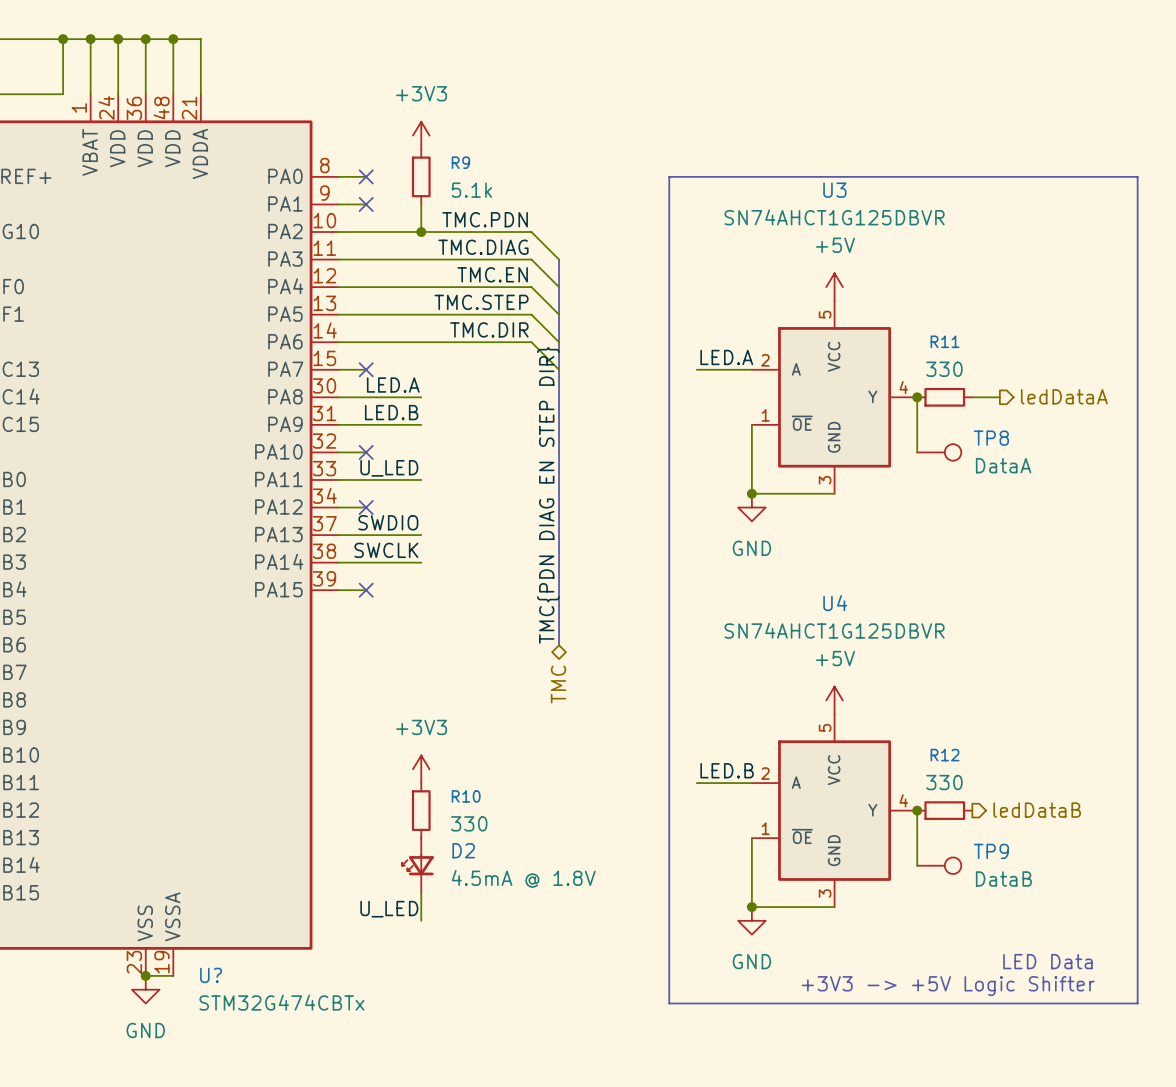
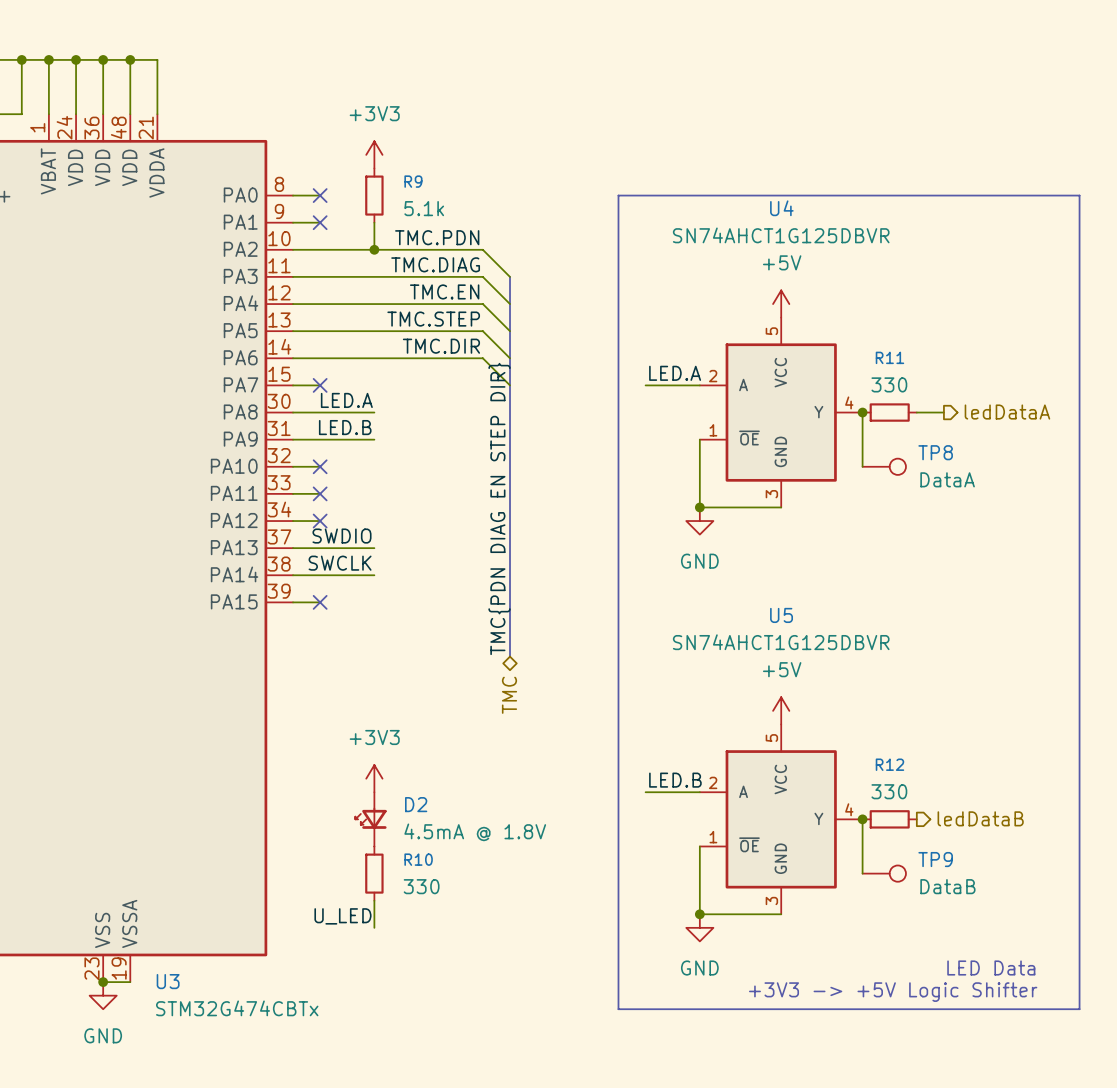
U3 name: U3 (834, 190) -> U4 (781, 208)
label: U_LED (389, 468) -> none
wire: (366, 479) (421, 479) -> none
no-connect mark: none -> (320, 493)
U4 name: U4 (835, 603) -> U5 (781, 615)
R10 position: (421, 810) -> (374, 873)
D2 position: (417, 865) -> (371, 819)
U? name: U? (211, 975) -> U3 (168, 981)

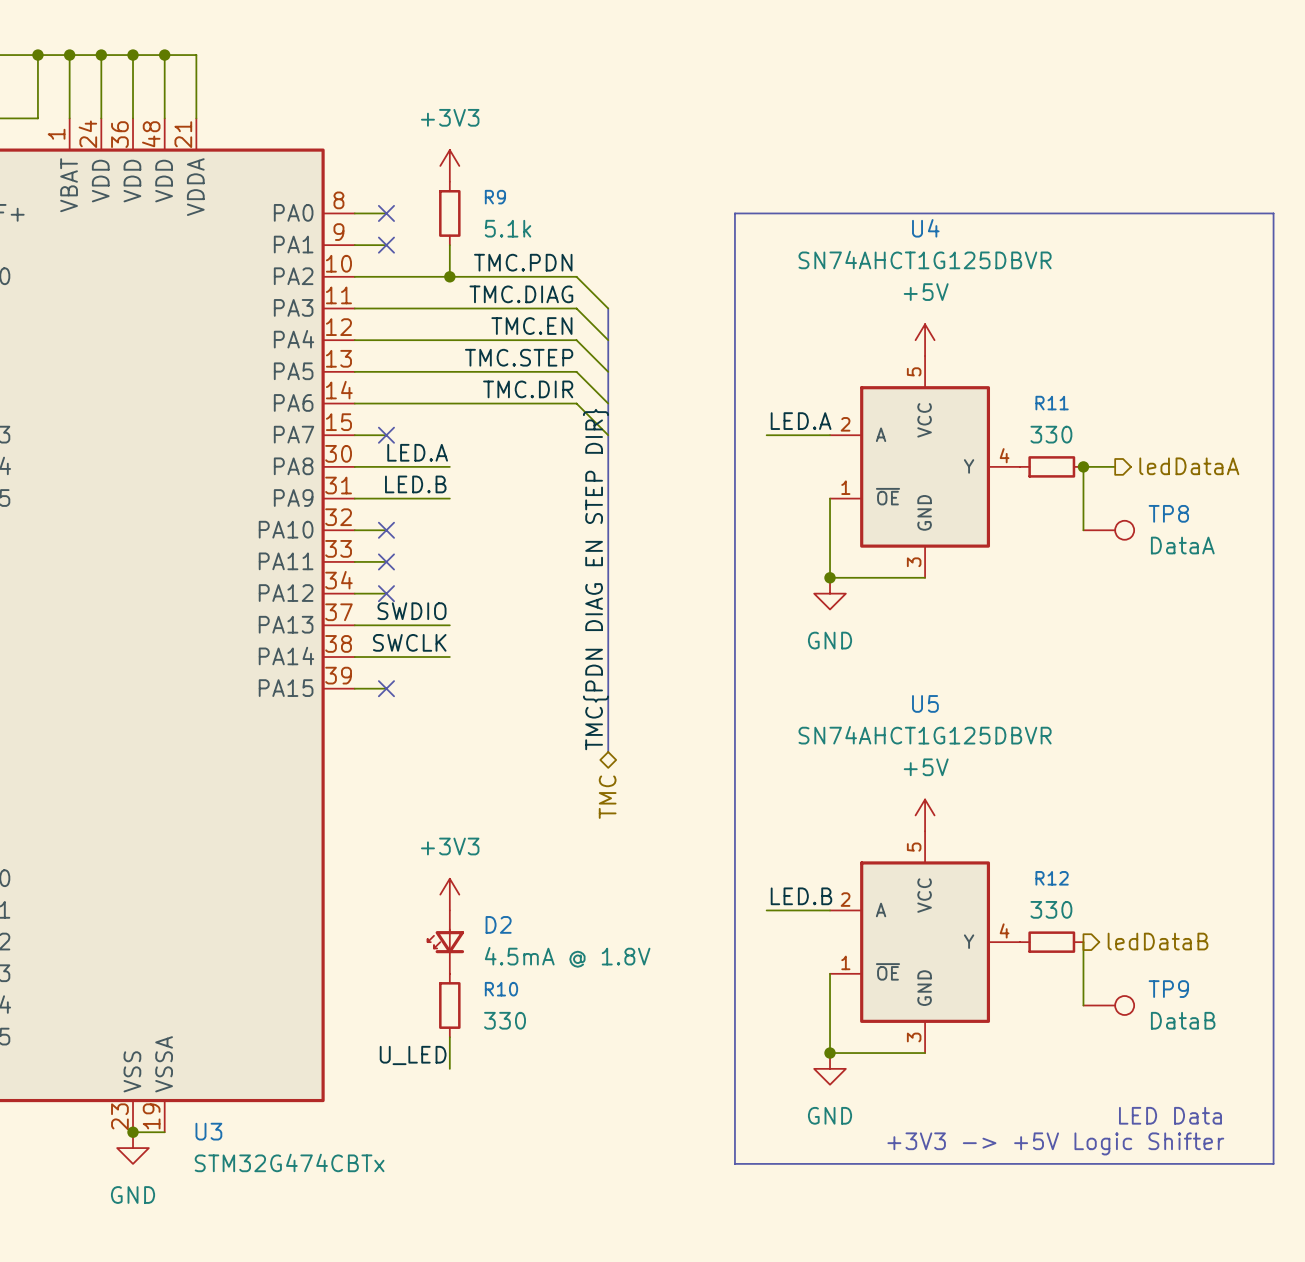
wire: (862, 412) (862, 466) -> (1083, 466) (1083, 530)
junction position: (862, 412) -> (1083, 466)
TP8 position: (884, 466) -> (1108, 530)
wire: (862, 819) (862, 873) -> (1083, 942) (1083, 1005)
junction: (862, 819) -> none
TP9 position: (884, 873) -> (1108, 1005)

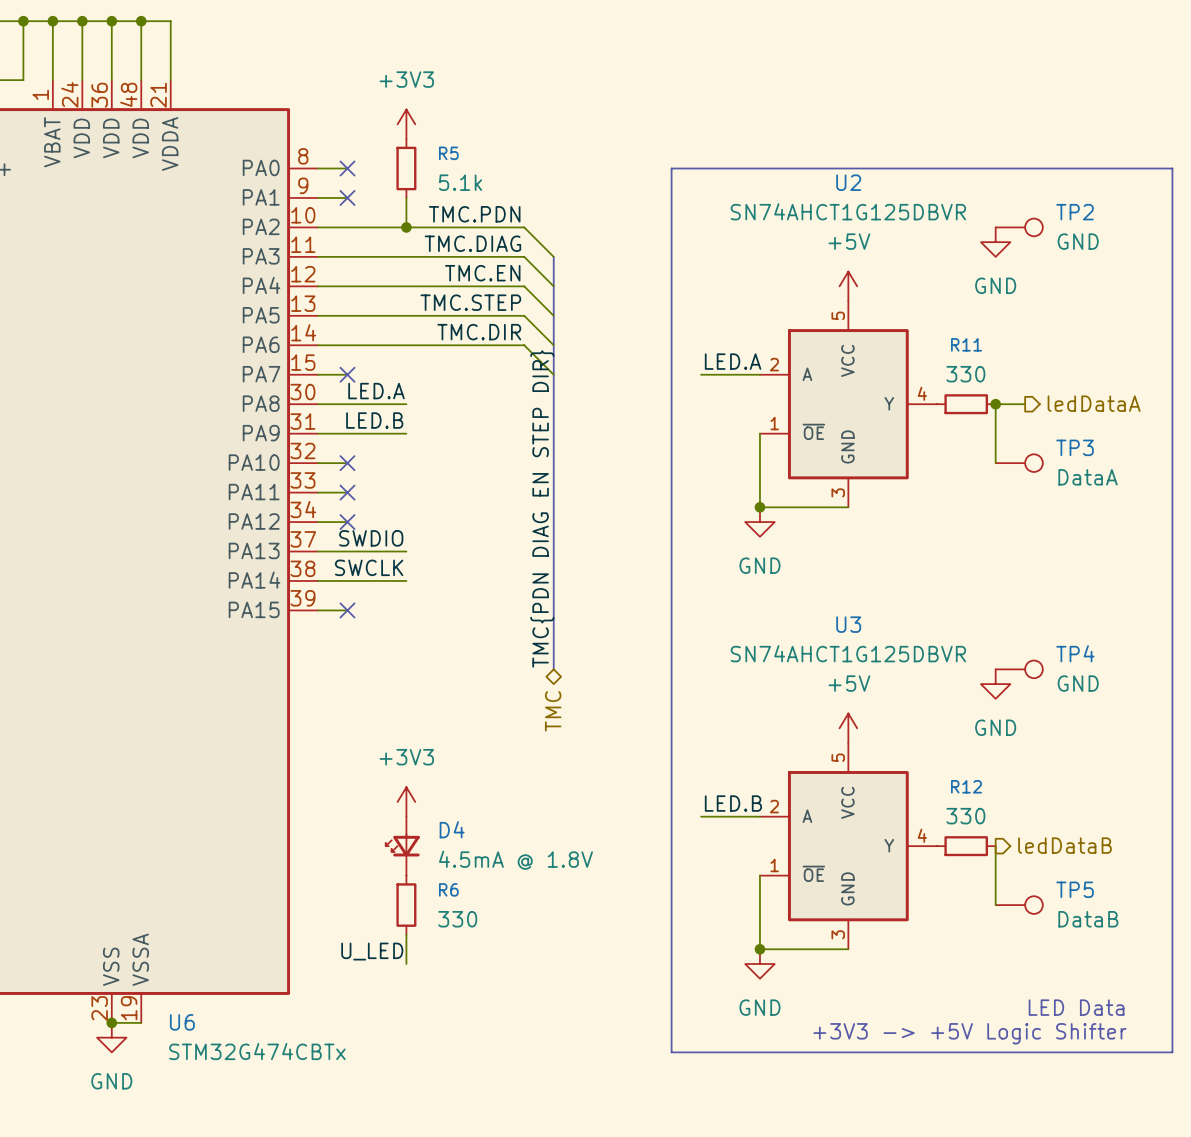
R9 name: R9 (495, 197) -> R5 (448, 153)
U4 name: U4 (925, 228) -> U2 (848, 182)
TP2: none -> GND (1019, 227)
power symbol: none -> GND (995, 242)
TP8 name: TP8 (1168, 513) -> TP3 (1075, 447)
U5 name: U5 (925, 703) -> U3 (848, 624)
TP4: none -> GND (1019, 669)
power symbol: none -> GND (995, 684)
D2 name: D2 (498, 924) -> D4 (452, 829)
R10 name: R10 (501, 989) -> R6 (448, 889)
TP9 name: TP9 (1168, 989) -> TP5 (1075, 889)
U3 name: U3 (208, 1131) -> U6 (182, 1022)

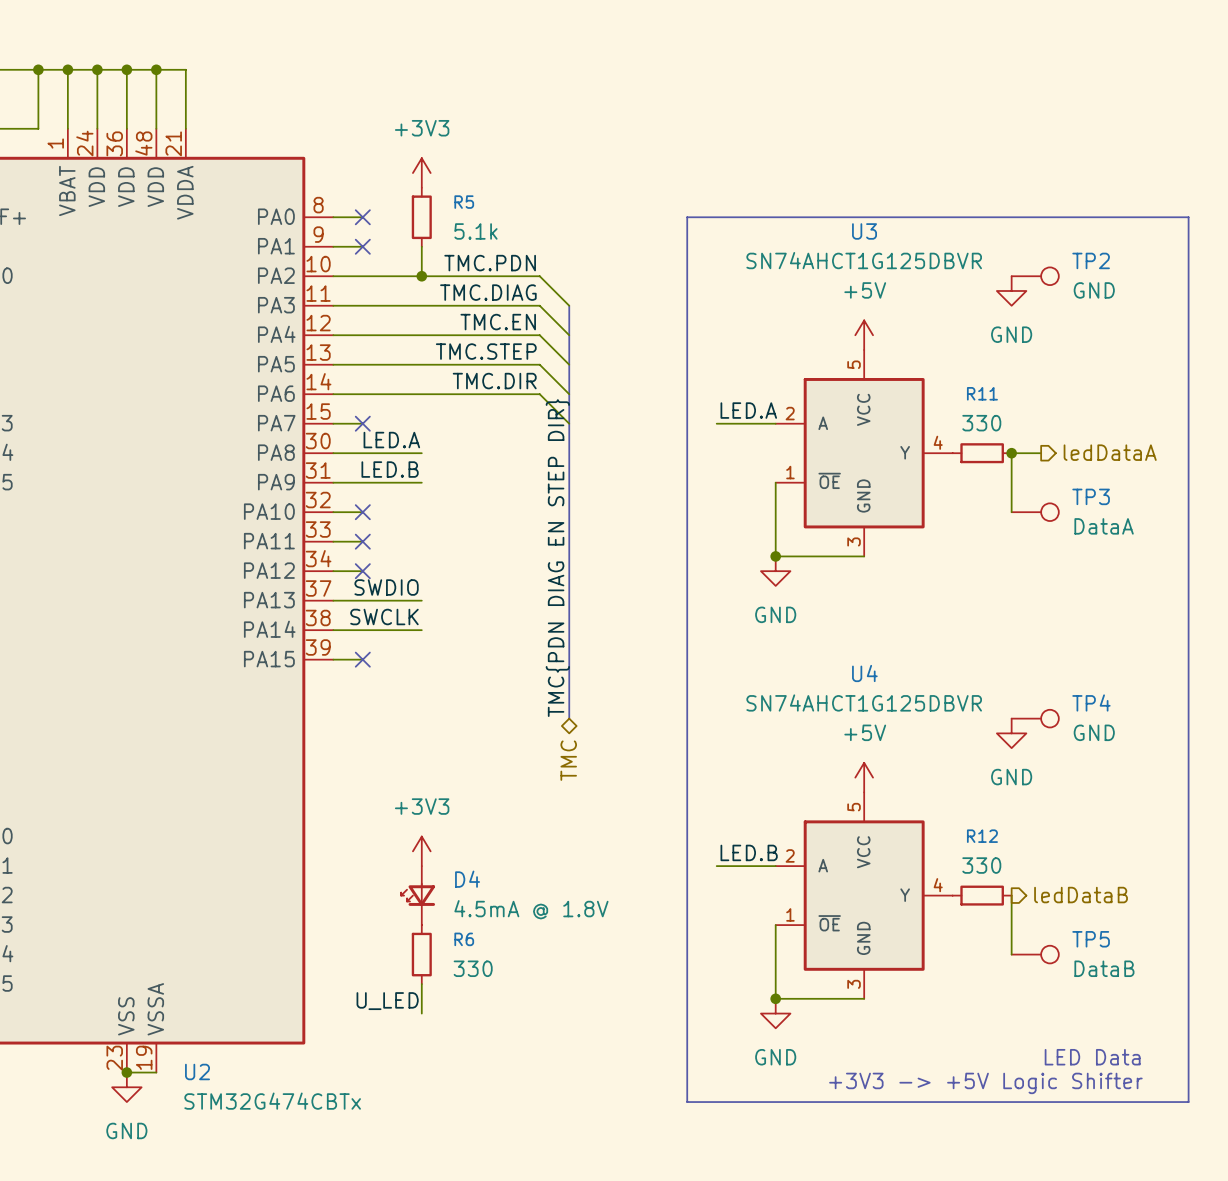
U2 name: U2 (848, 182) -> U3 (864, 231)
U3 name: U3 (848, 624) -> U4 (864, 673)
U6 name: U6 (182, 1022) -> U2 (197, 1071)

